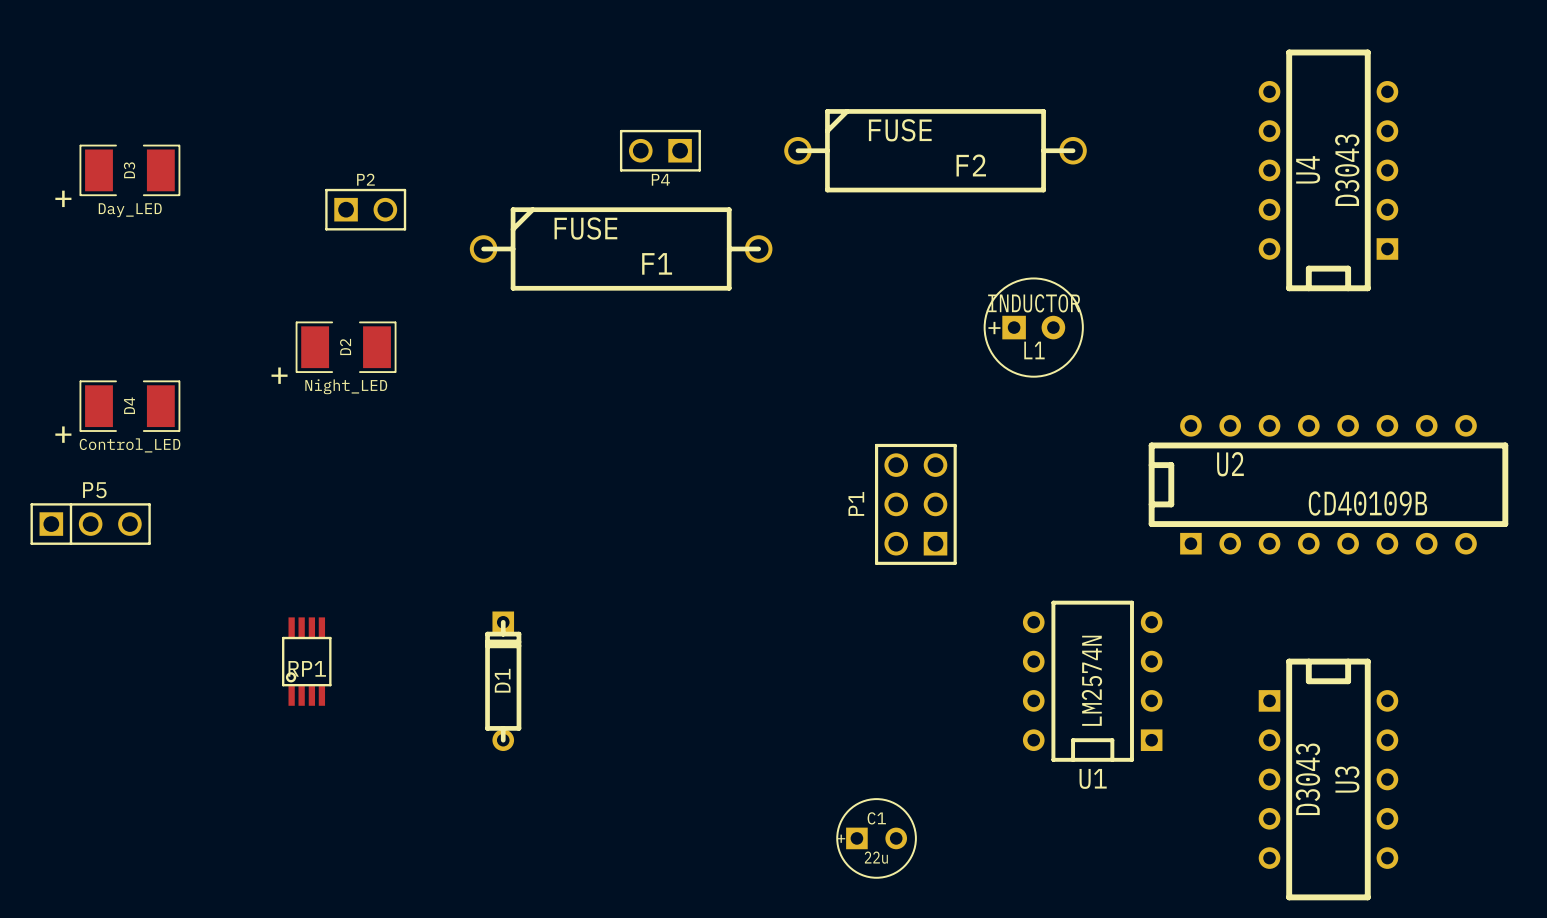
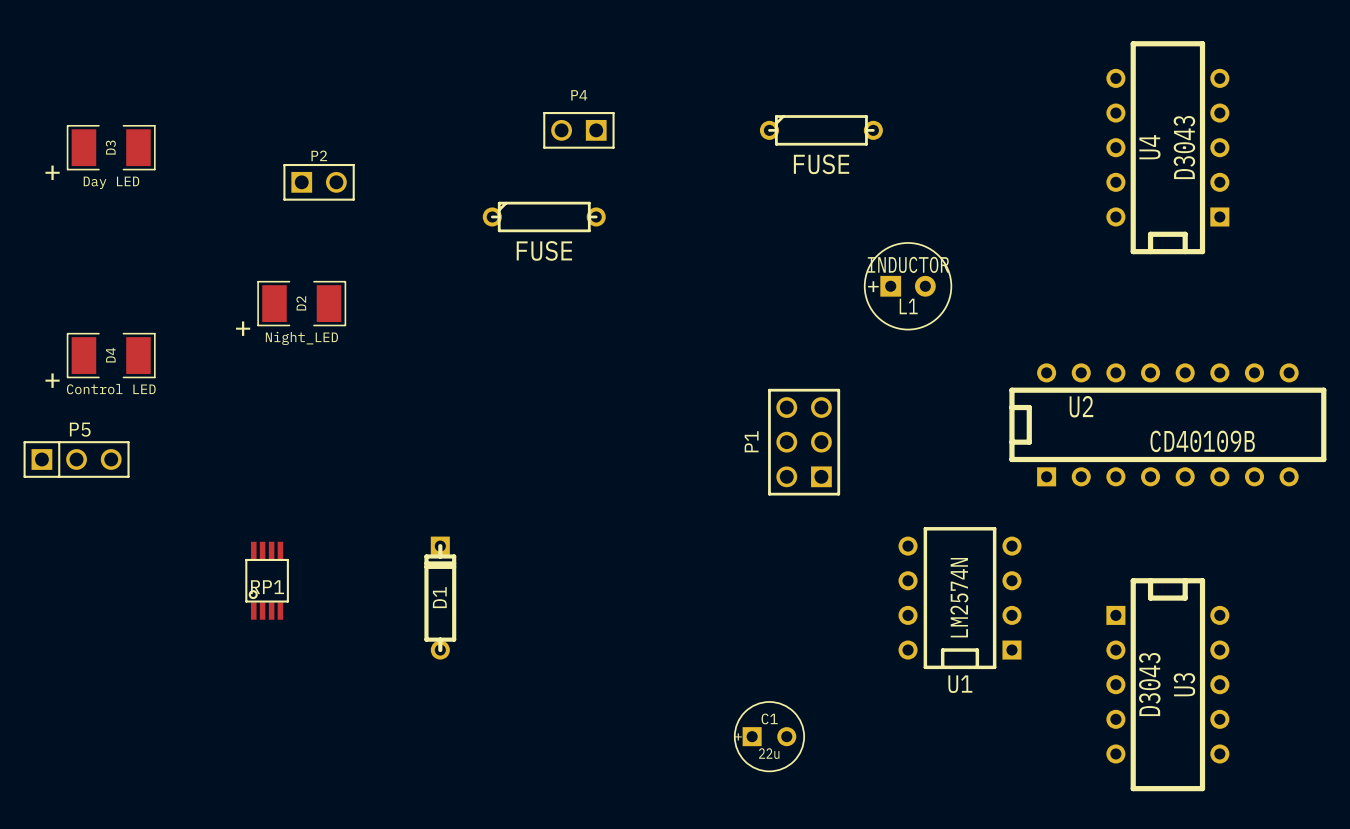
F2: FUSE (935, 150) -> none
part: none -> FUSE (821, 130)
P4 name position: P4 (660, 179) -> P4 (579, 95)
D3 value: Day_LED (130, 210) -> Day LED (111, 182)
F1: FUSE (621, 248) -> none
part: none -> FUSE (544, 216)
D4 value: Control_LED (130, 445) -> Control LED (111, 389)

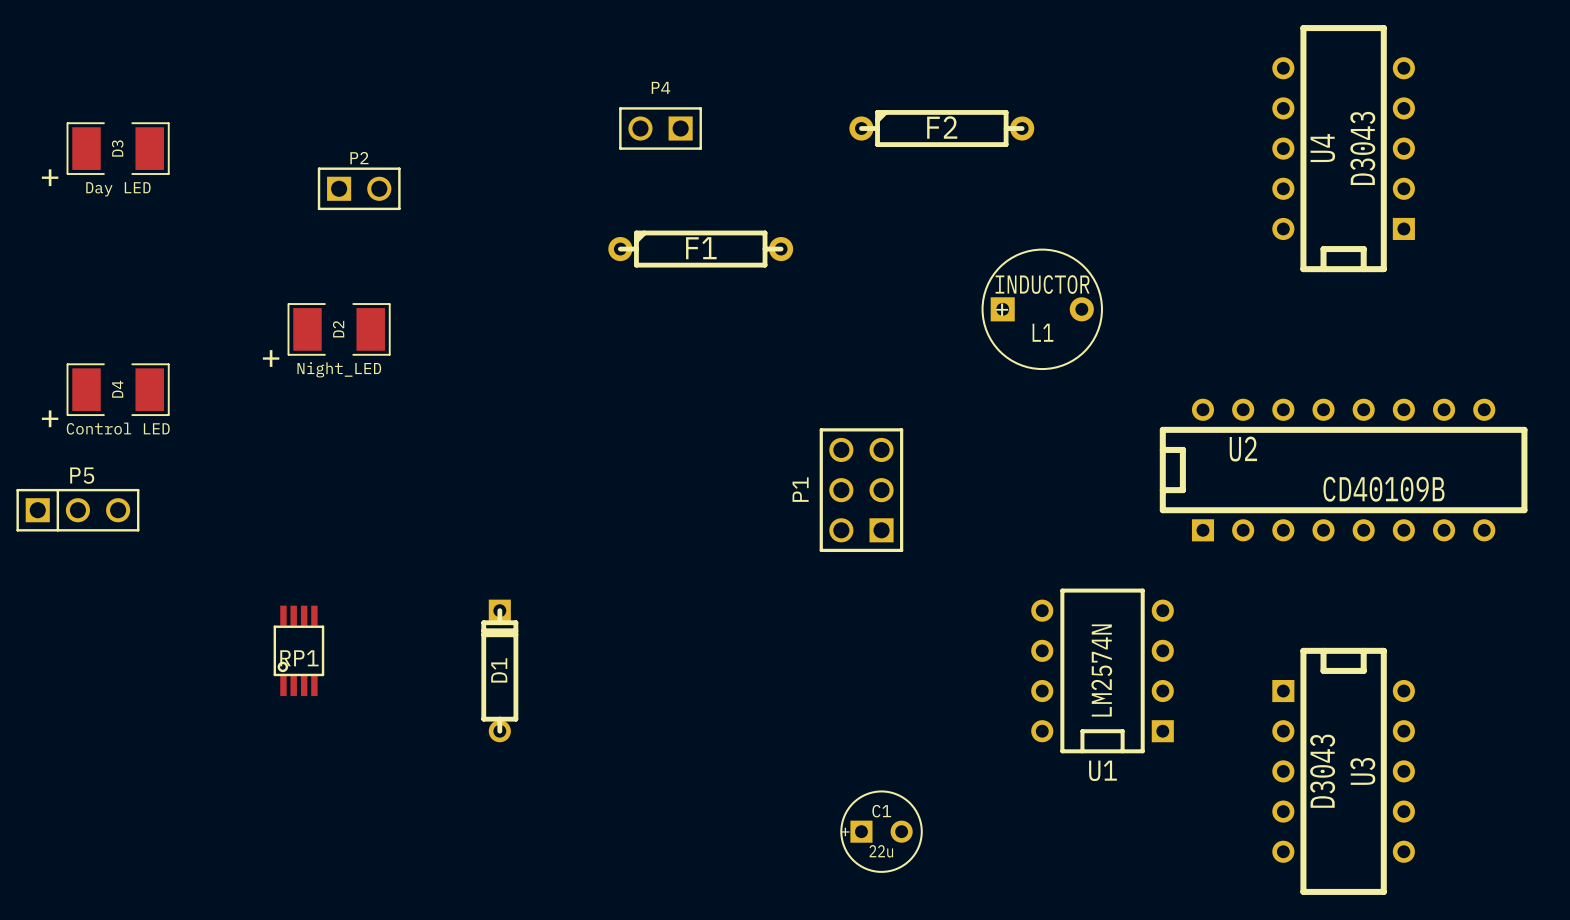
part: FUSE (821, 130) -> none
F2: none -> (941, 128)
part: FUSE (544, 216) -> none
F1: none -> (700, 249)
L1 footprint: [863, 242, 953, 331] -> [981, 248, 1103, 371]
P1 position: (804, 442) -> (861, 490)

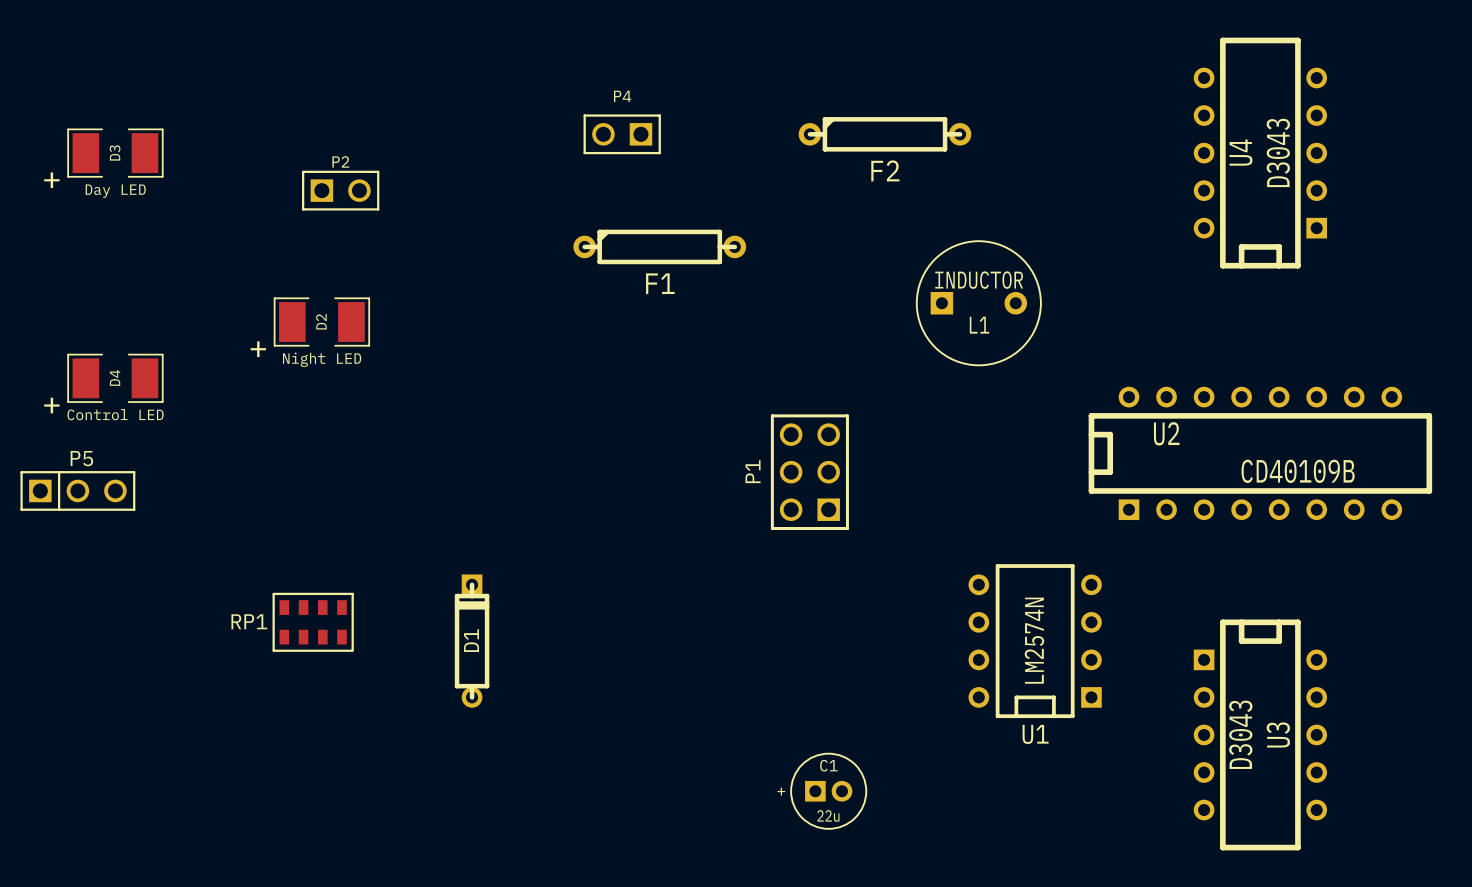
F2 name position: F2 (942, 127) -> F2 (885, 170)
F1 name position: F1 (701, 248) -> F1 (660, 283)
L1 footprint: [981, 248, 1103, 371] -> [915, 240, 1042, 367]
D2 value: Night_LED (339, 369) -> Night LED (322, 359)
RP1 footprint: [273, 605, 325, 697] -> [272, 592, 354, 652]
RP1 name position: RP1 (299, 658) -> RP1 (249, 621)
C1 footprint: [840, 790, 923, 873] -> [790, 752, 868, 830]

